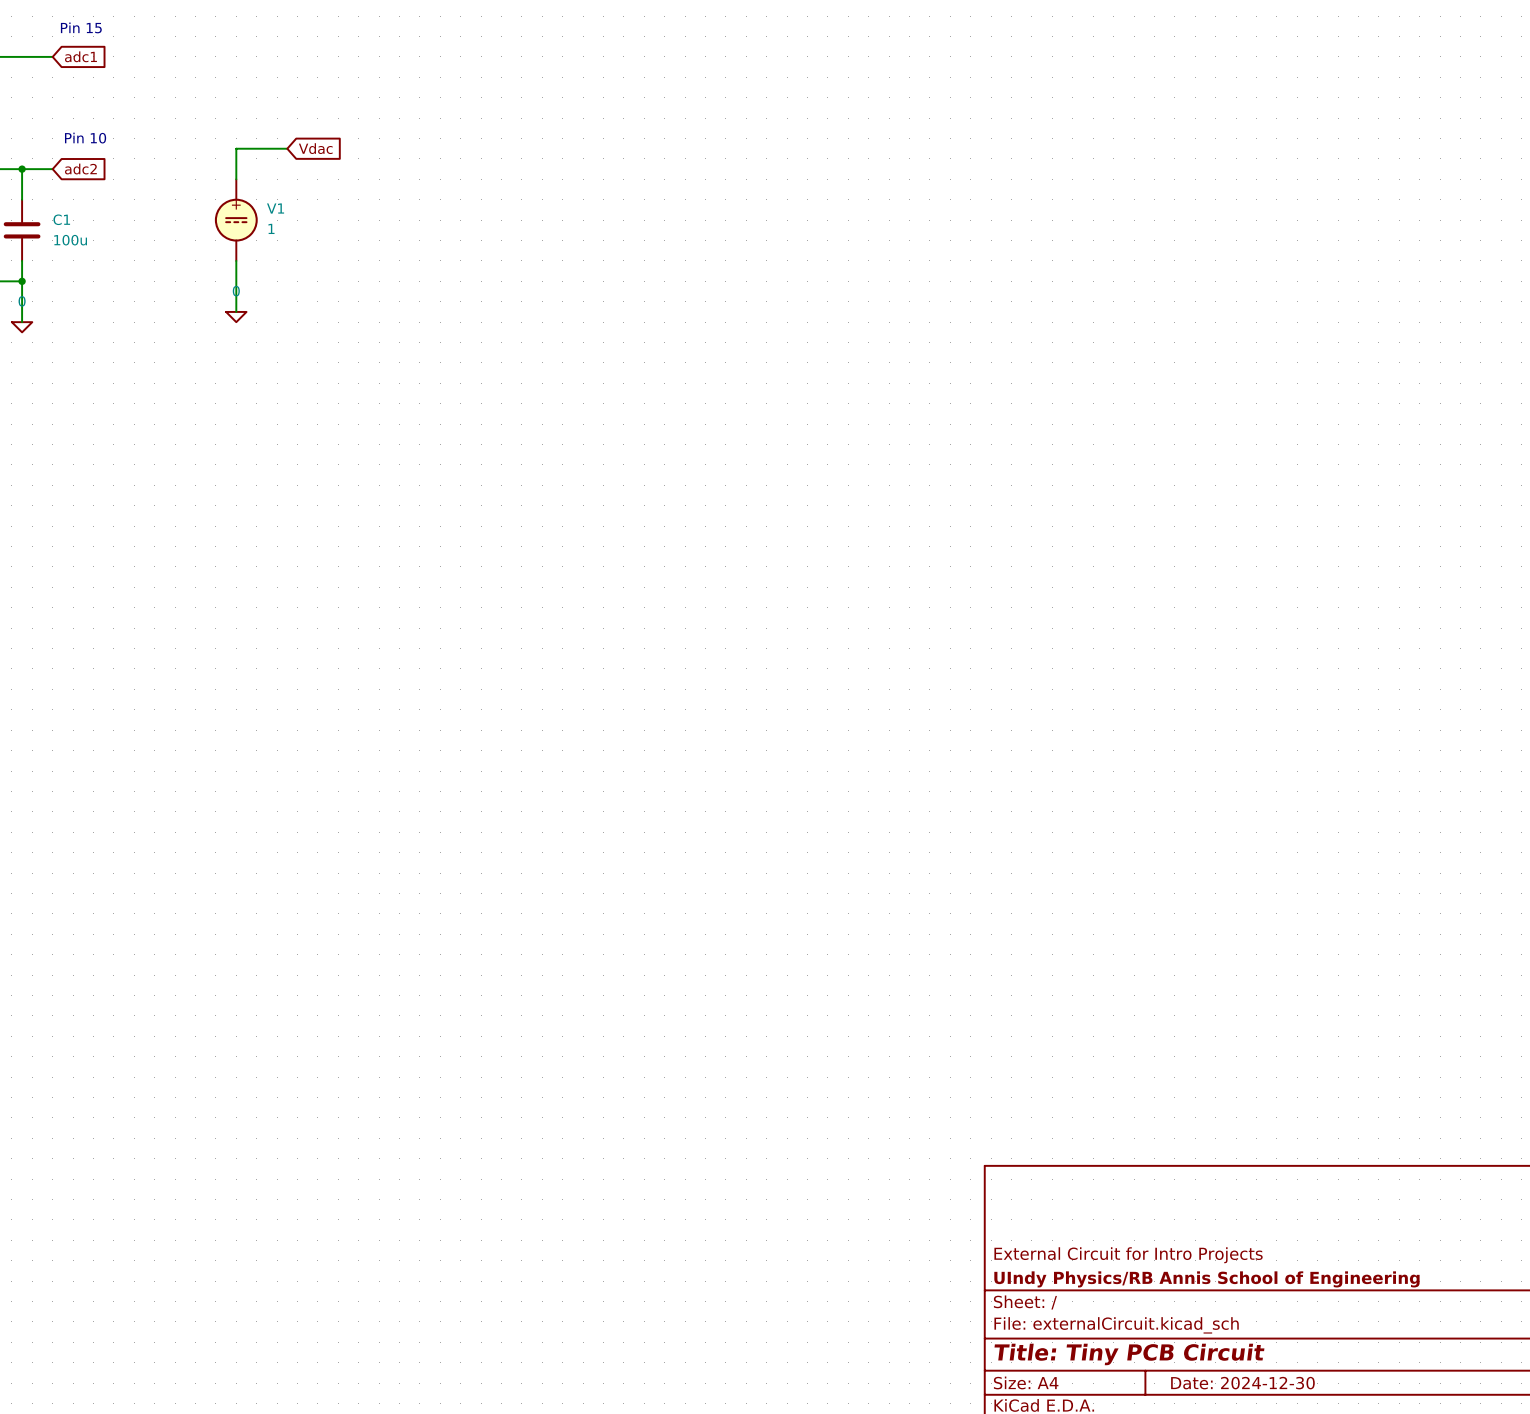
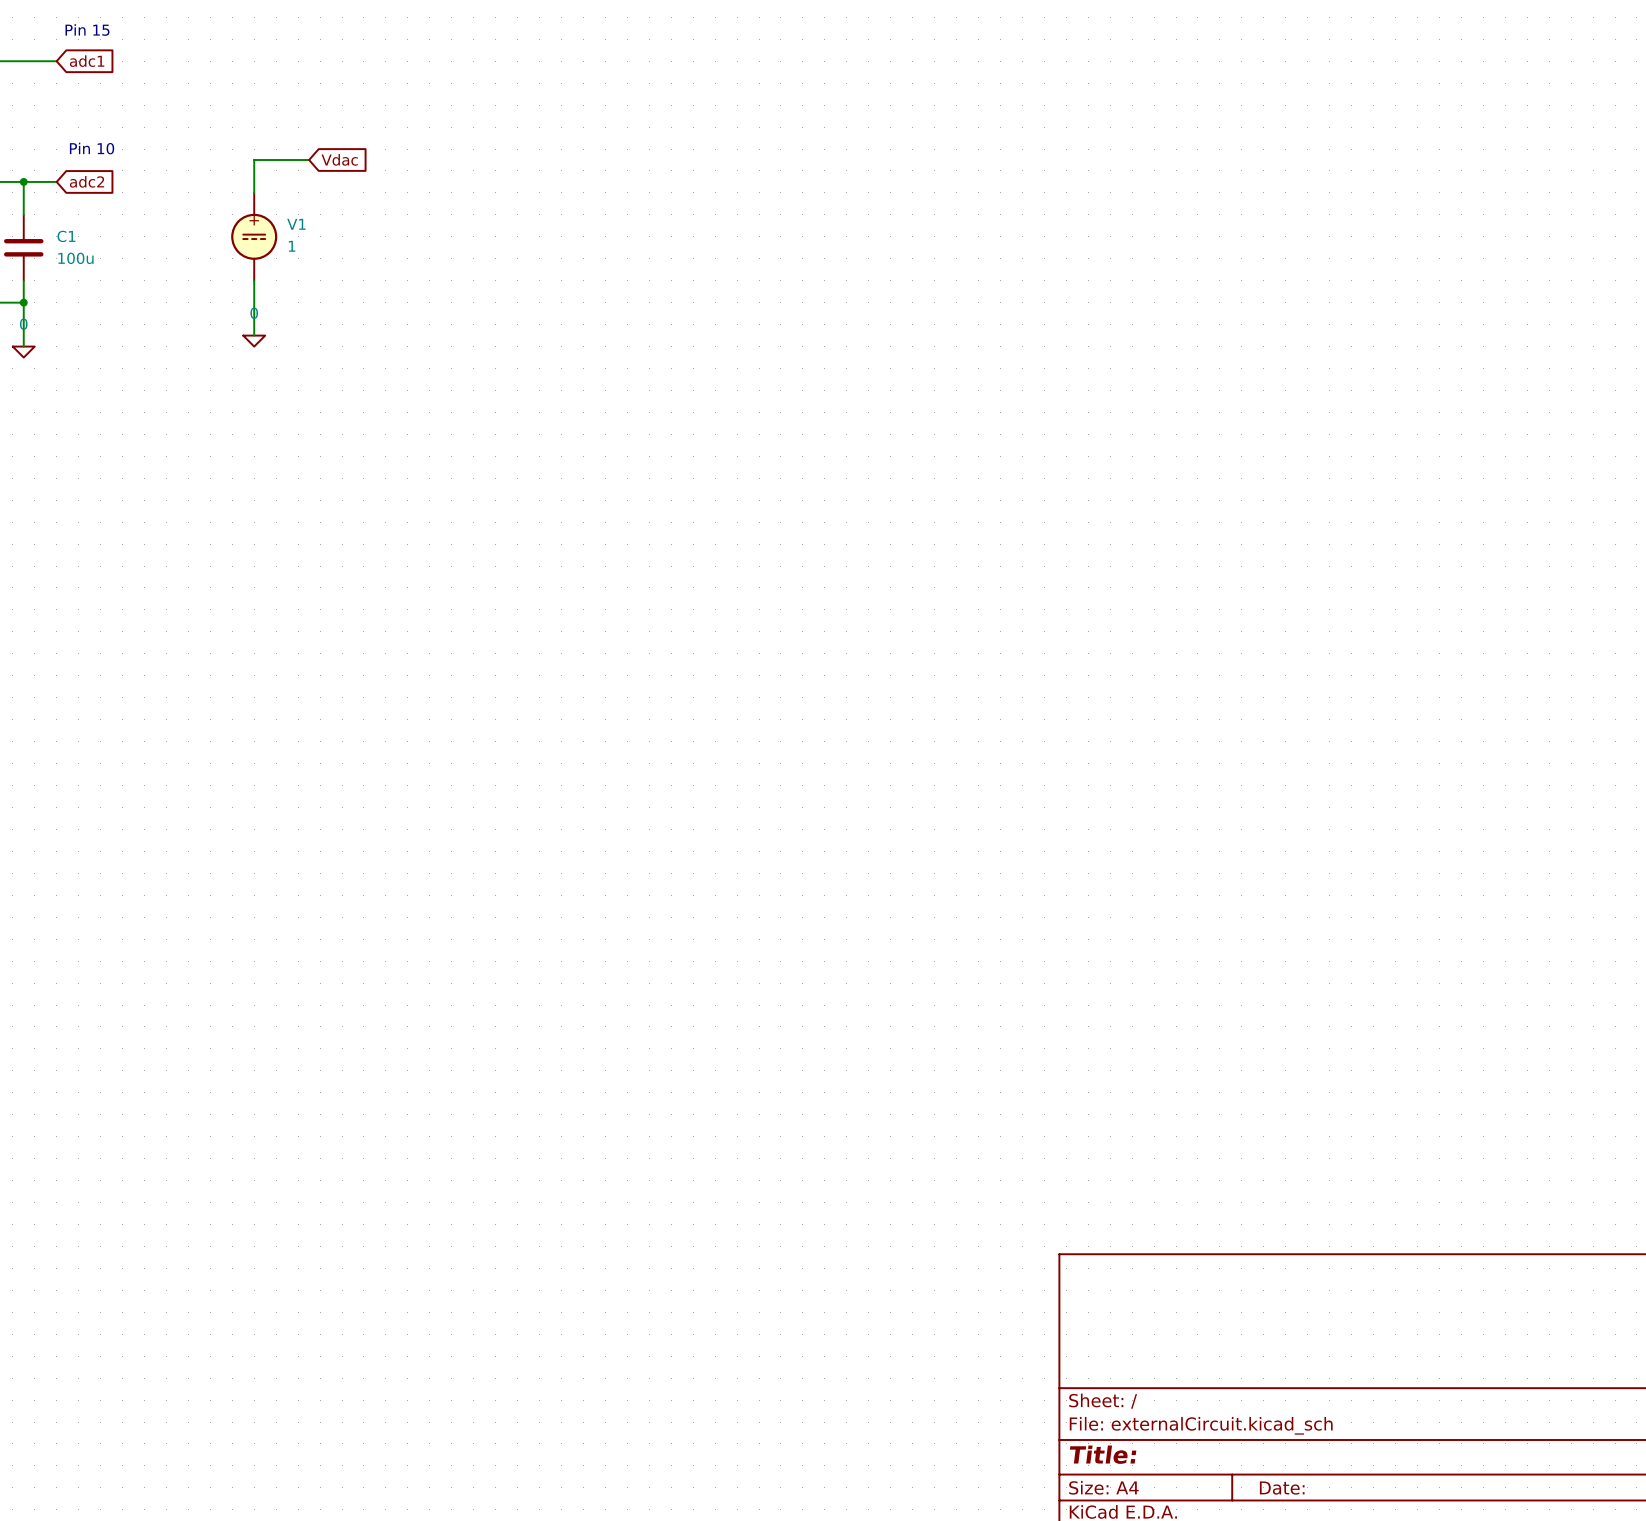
title block: External Circuit for Intro Projects (1128, 1255) -> none
title block: UIndy Physics/RB Annis School of Engineering (1206, 1279) -> none
title block: Title: Tiny PCB Circuit (1129, 1354) -> Title: (1103, 1454)
title block: Date: 2024-12-30 (1242, 1383) -> Date: (1282, 1488)

